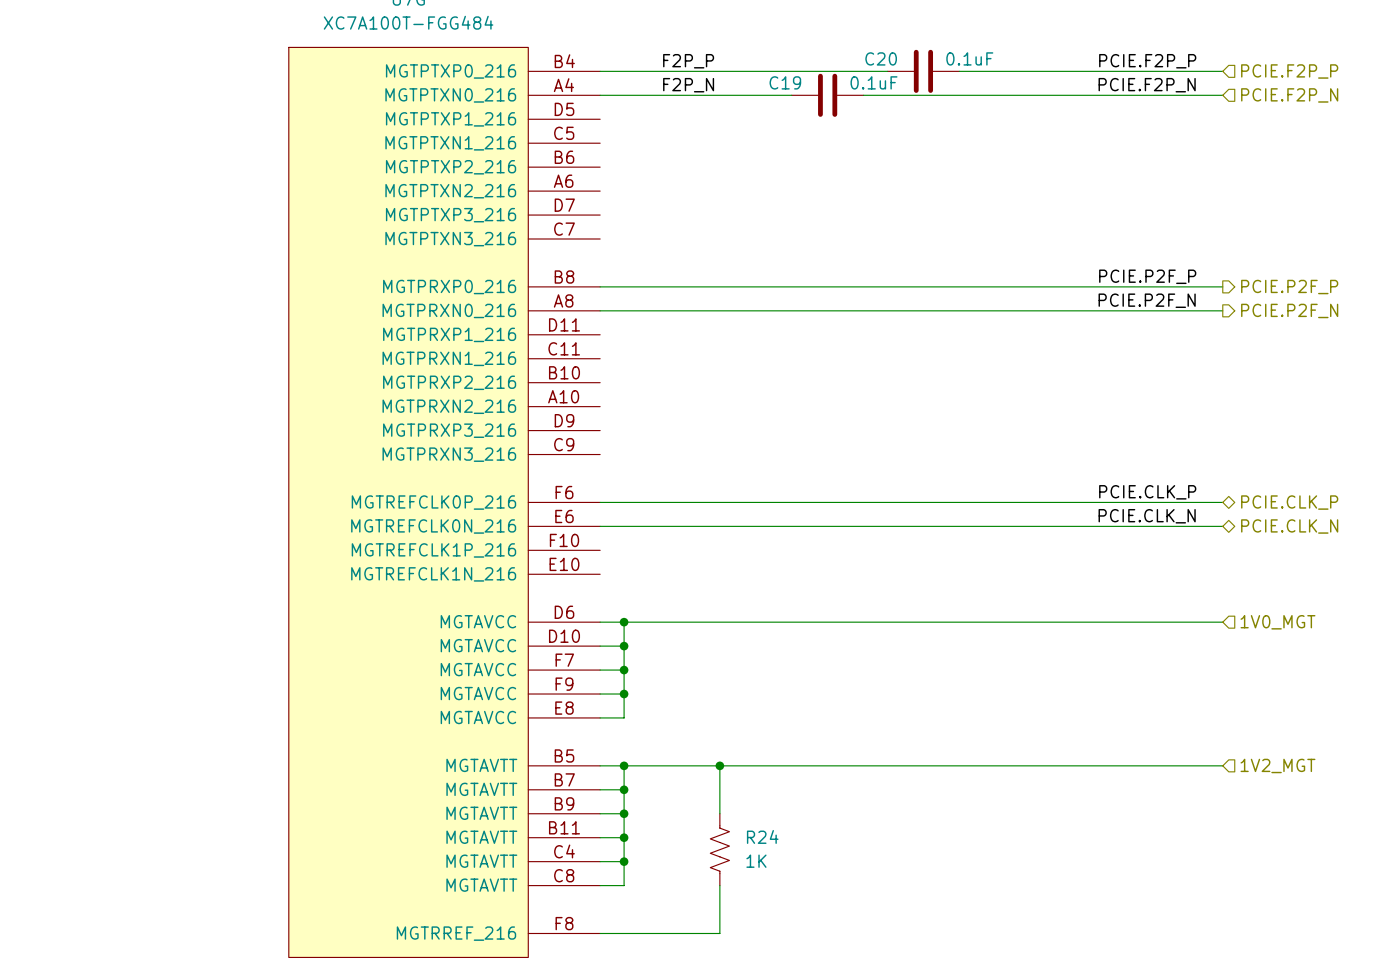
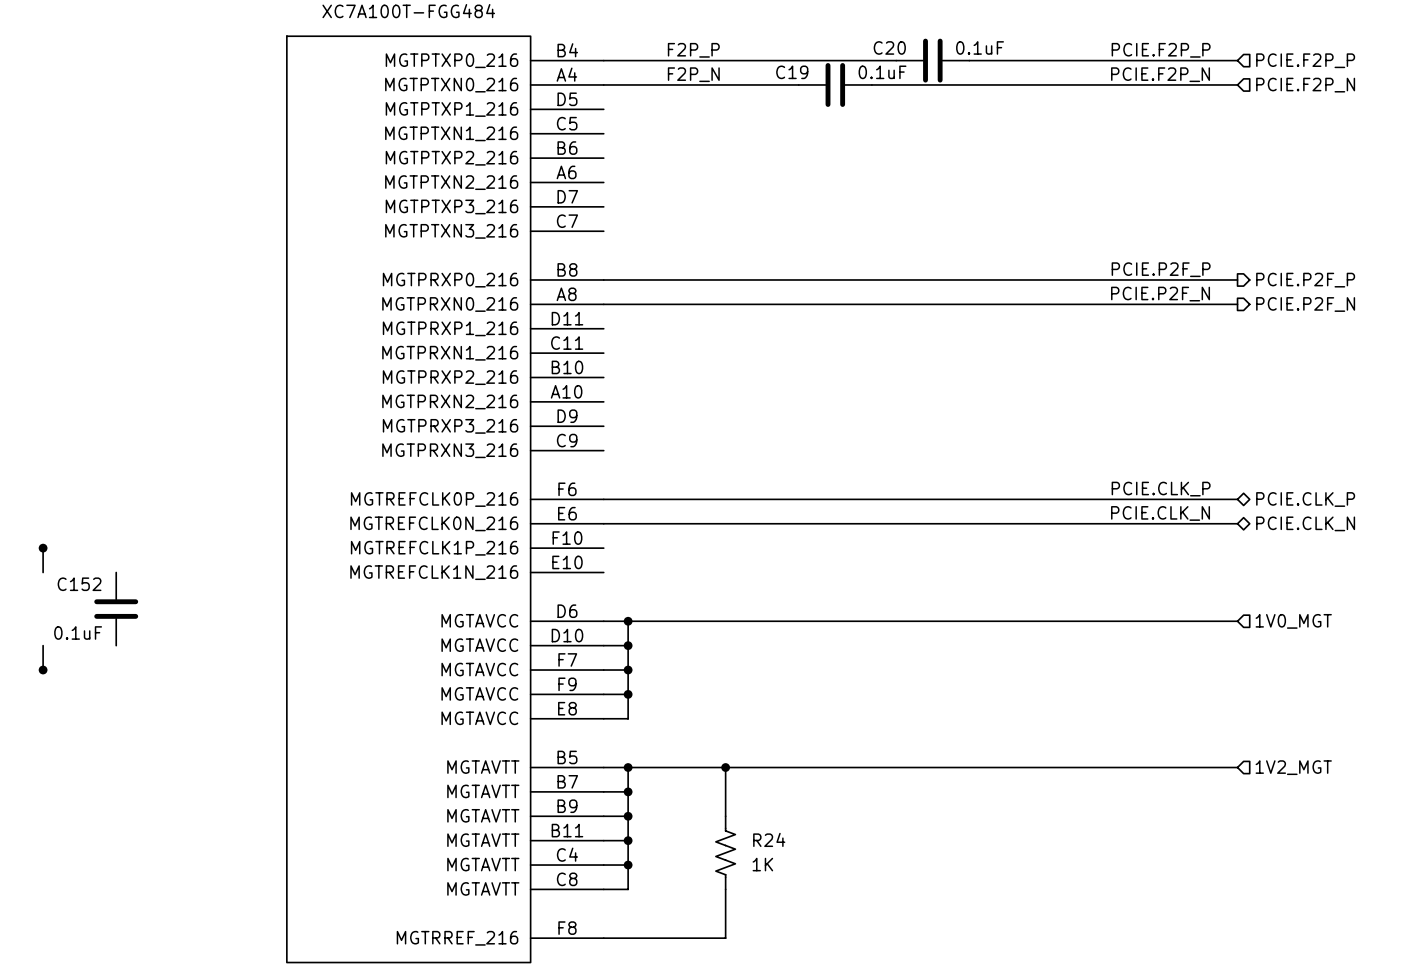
wire: none -> (43, 548) (43, 572)
junction: none -> (43, 548)
C152: none -> 0.1uF (116, 609)
wire: none -> (43, 645) (43, 670)
junction: none -> (43, 670)

